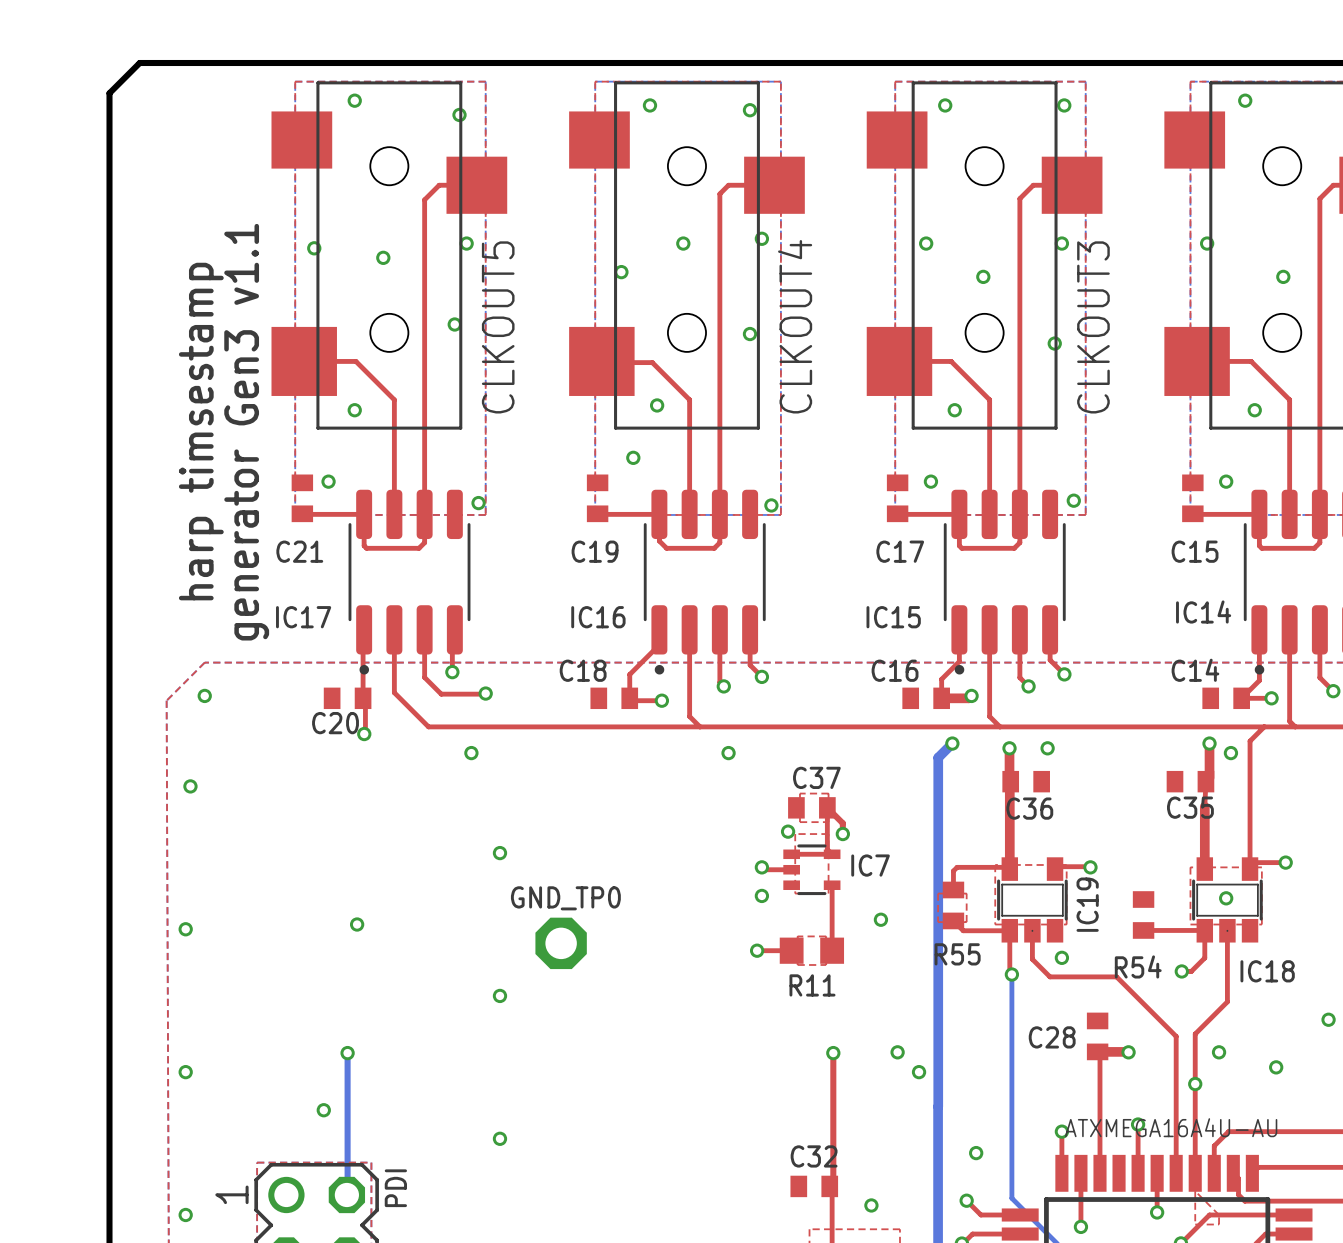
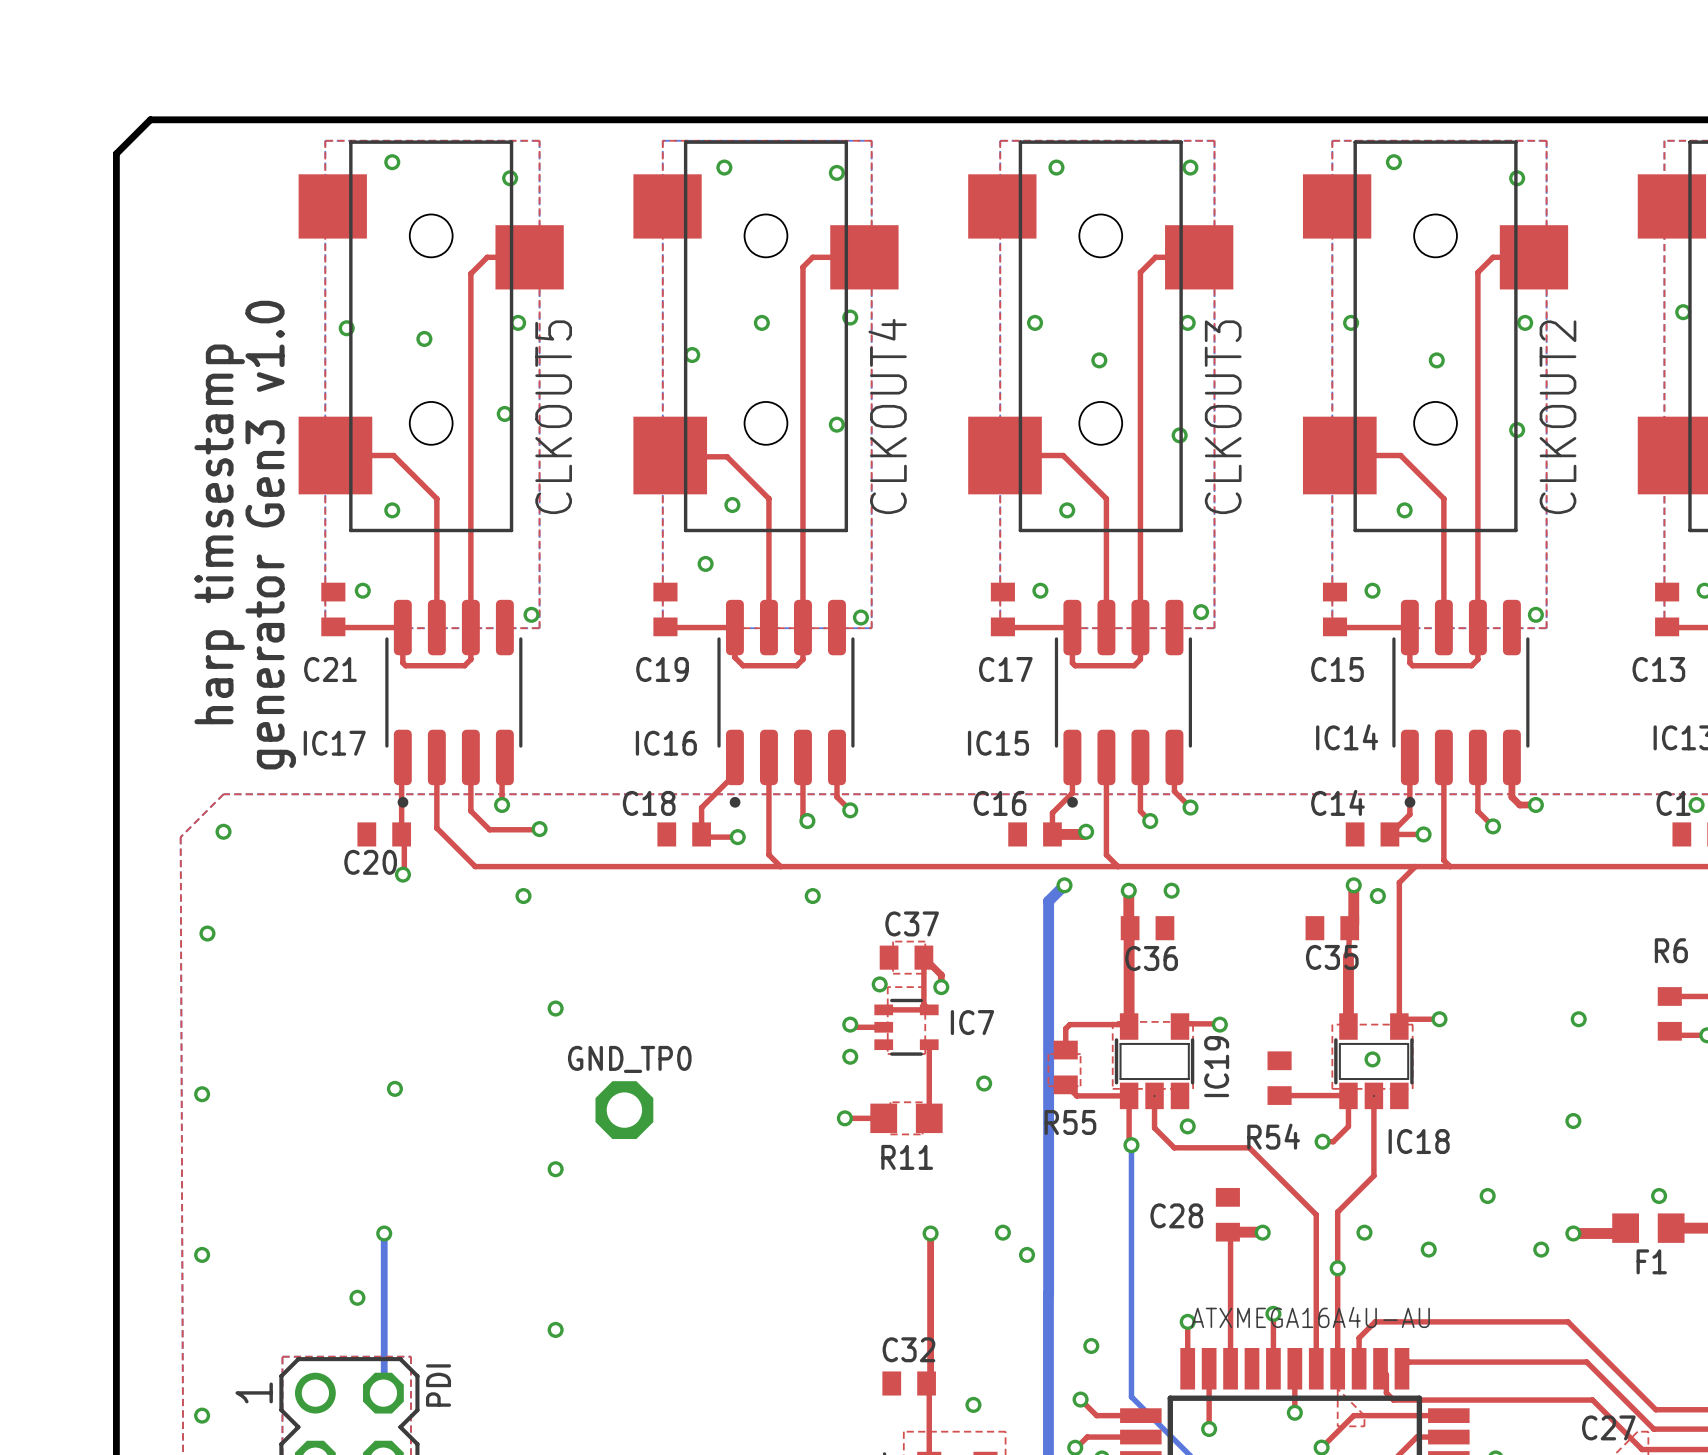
text: generator Gen3 v1.1 (246, 432) -> generator Gen3 v1.0 (270, 535)

